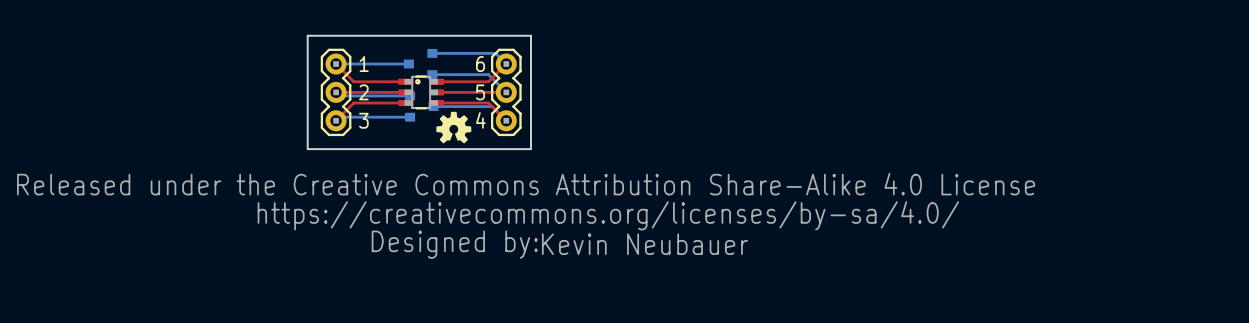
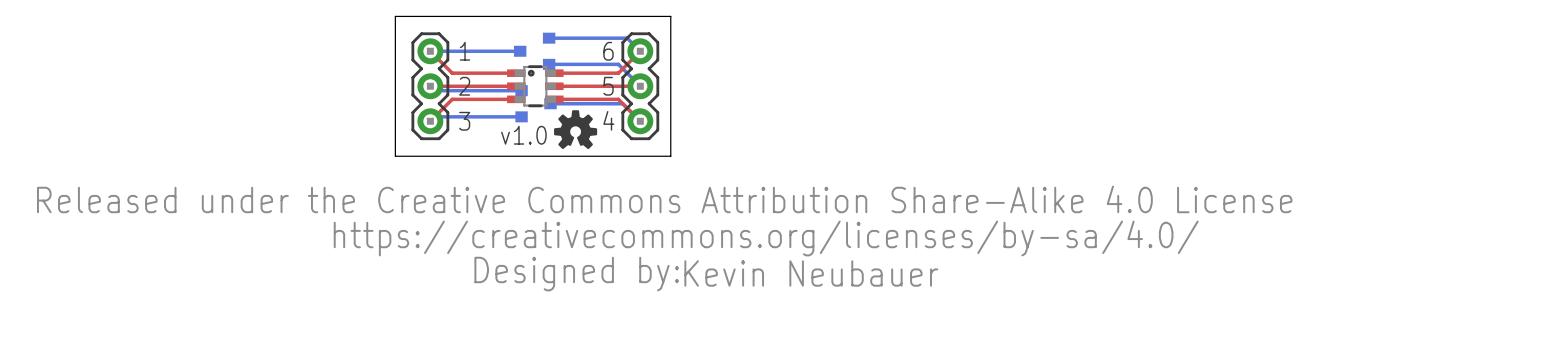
text: none -> v1.0 (523, 135)

